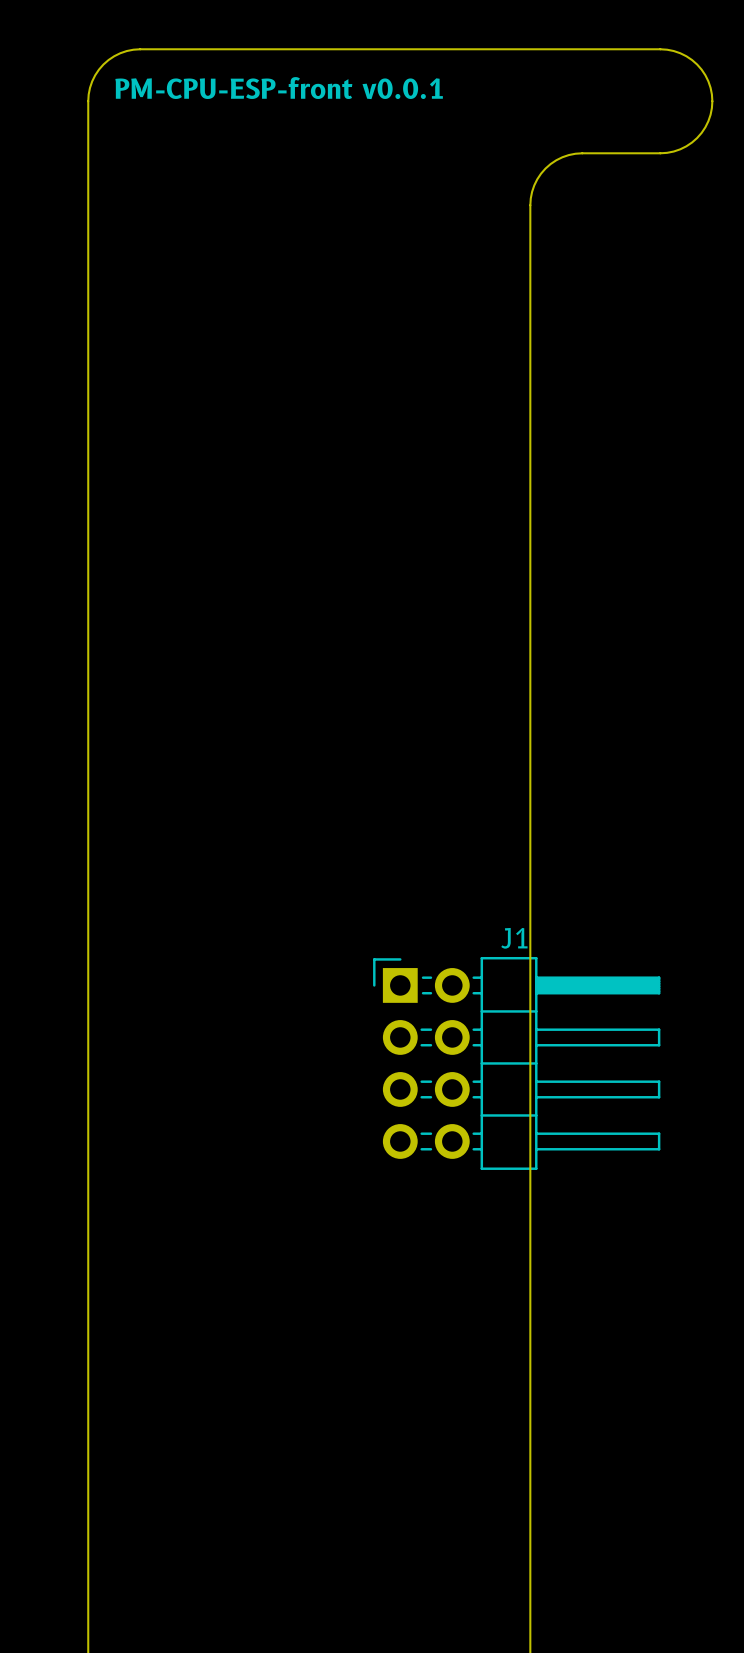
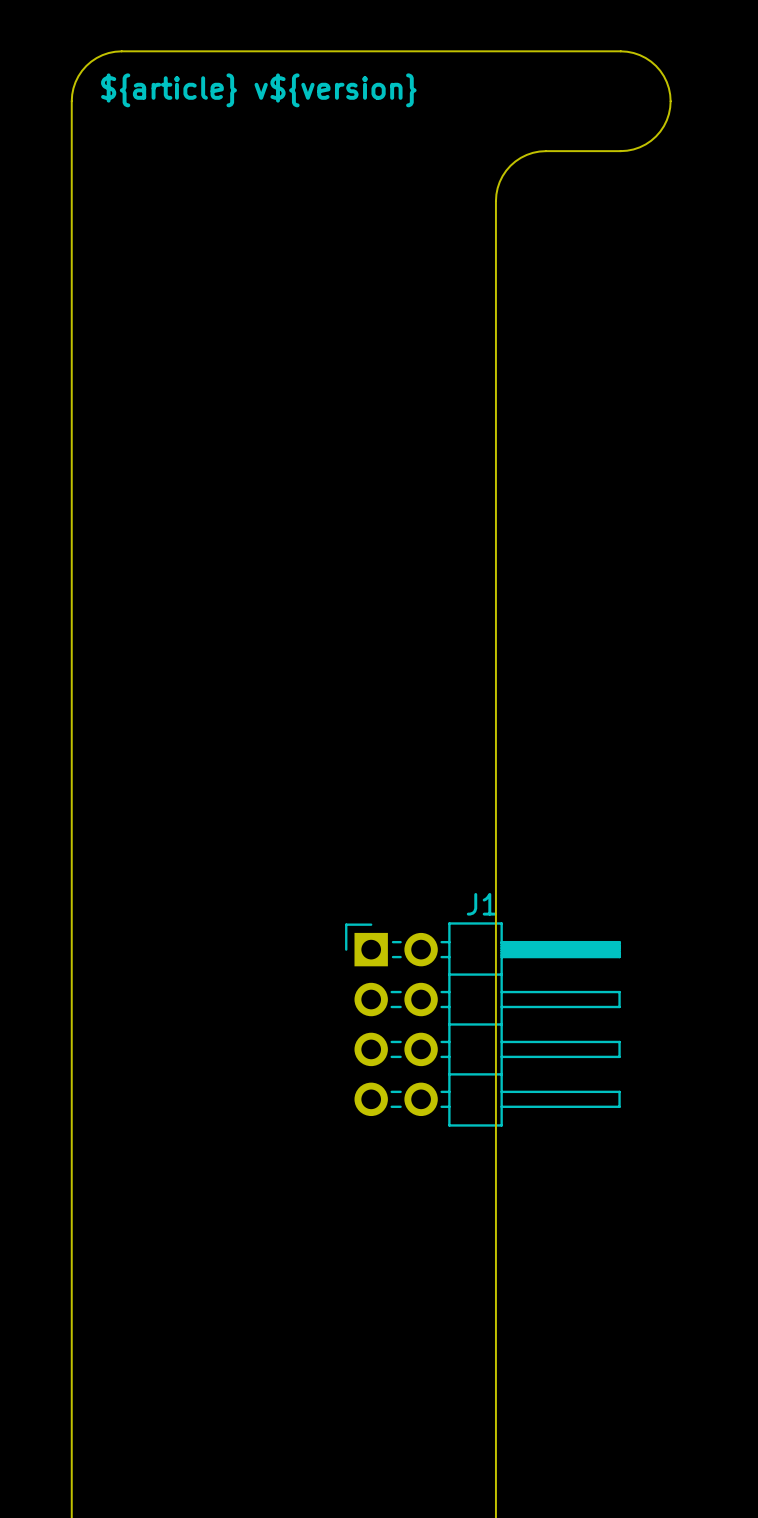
text: PM-CPU-ESP-front v0.0.1 (279, 88) -> ${article} v${version} (258, 90)

